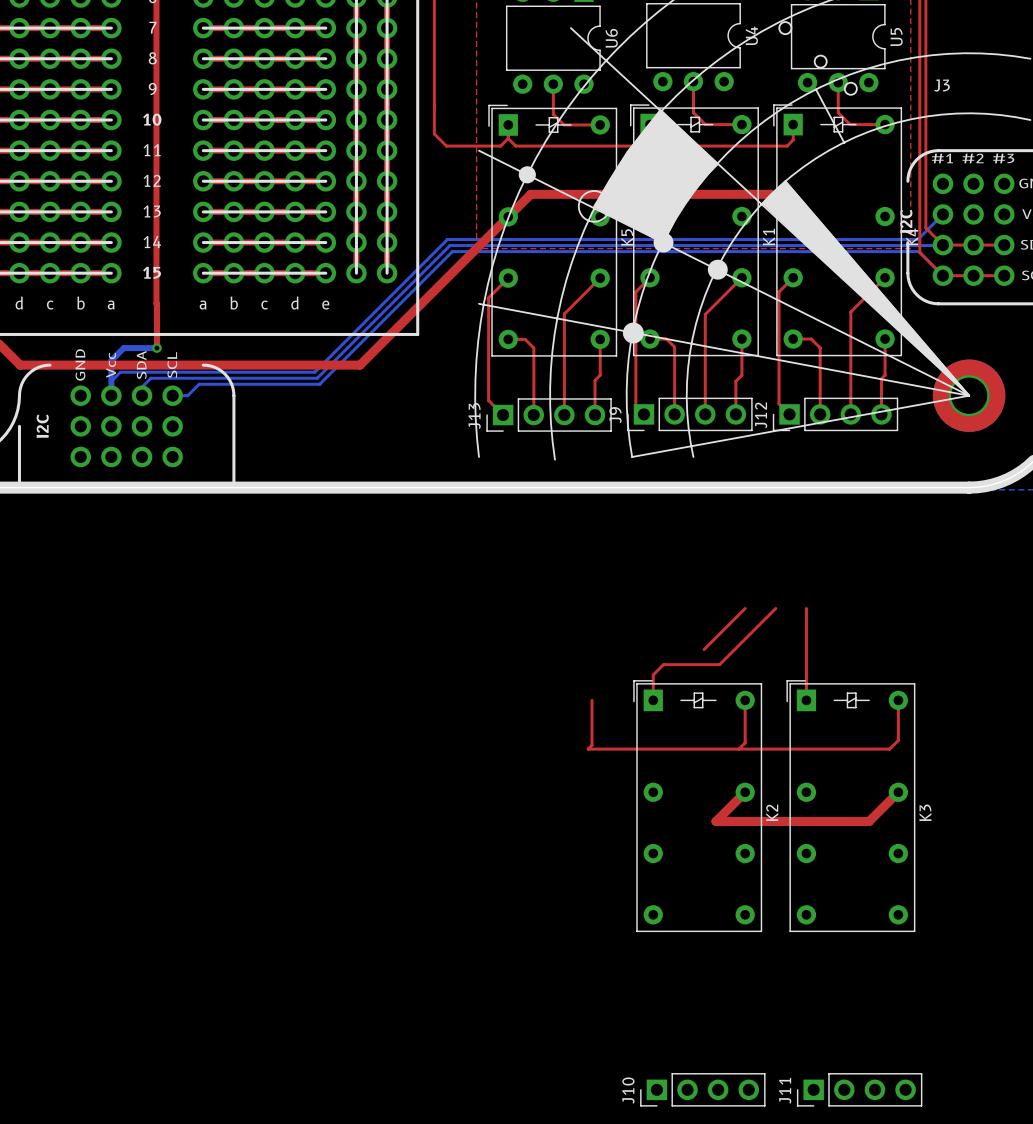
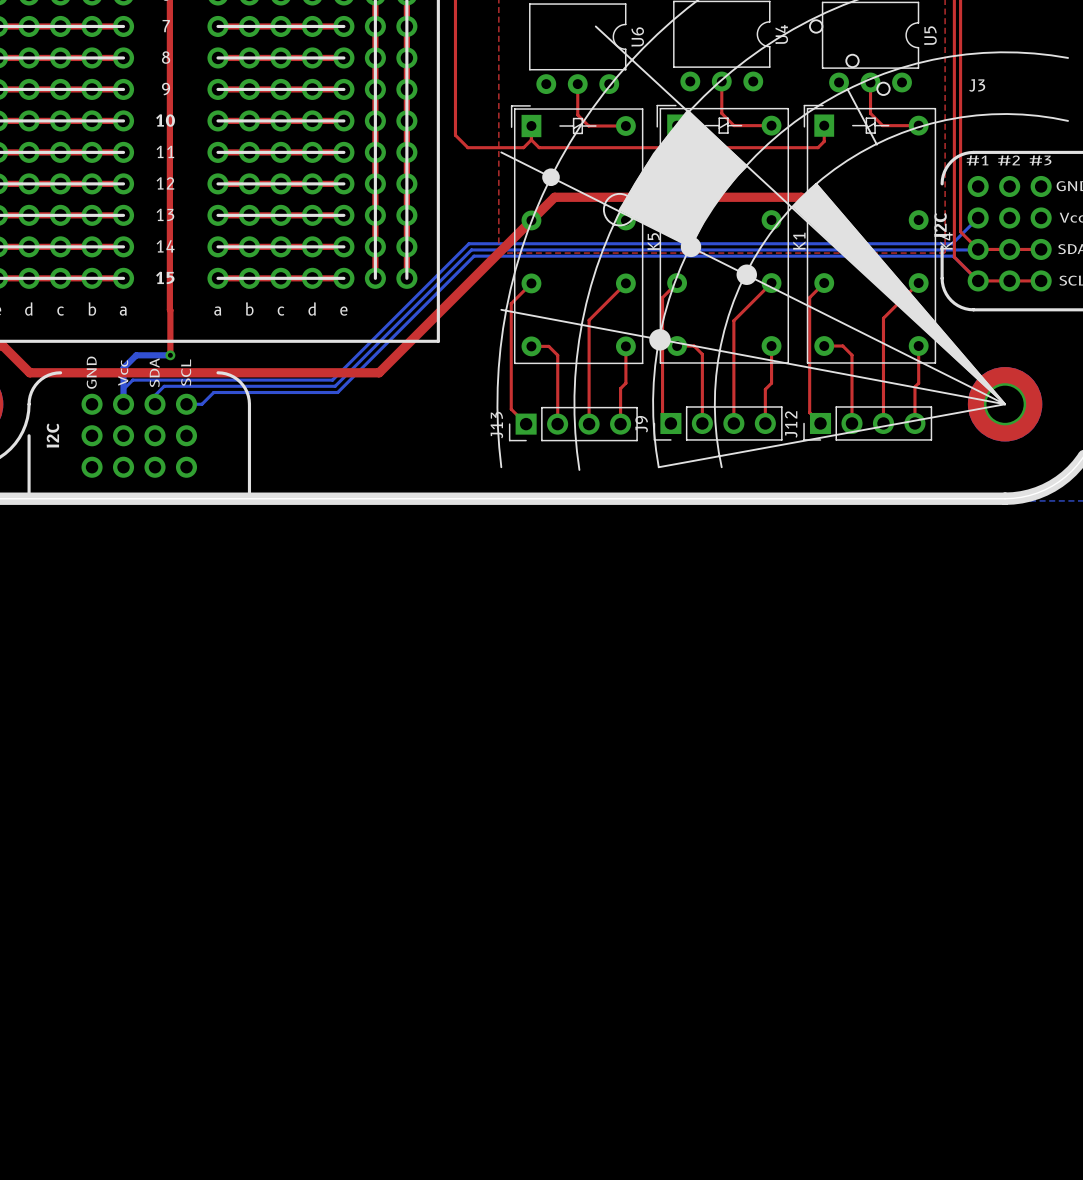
top track: (745, 608) (704, 649) -> none
top track: (775, 608) (719, 664) (663, 664) (653, 674) (653, 700) -> none
top track: (806, 608) (806, 700) -> none
top track: (592, 700) (592, 745) (588, 749) (889, 749) (898, 740) (898, 700) -> none
top track: (745, 700) (745, 742) (738, 749) -> none
top track: (745, 792) (715, 821) (869, 821) (898, 792) -> none
K2: (697, 806) -> none
K3: (850, 806) -> none
J10: (702, 1089) -> none
J11: (859, 1089) -> none

